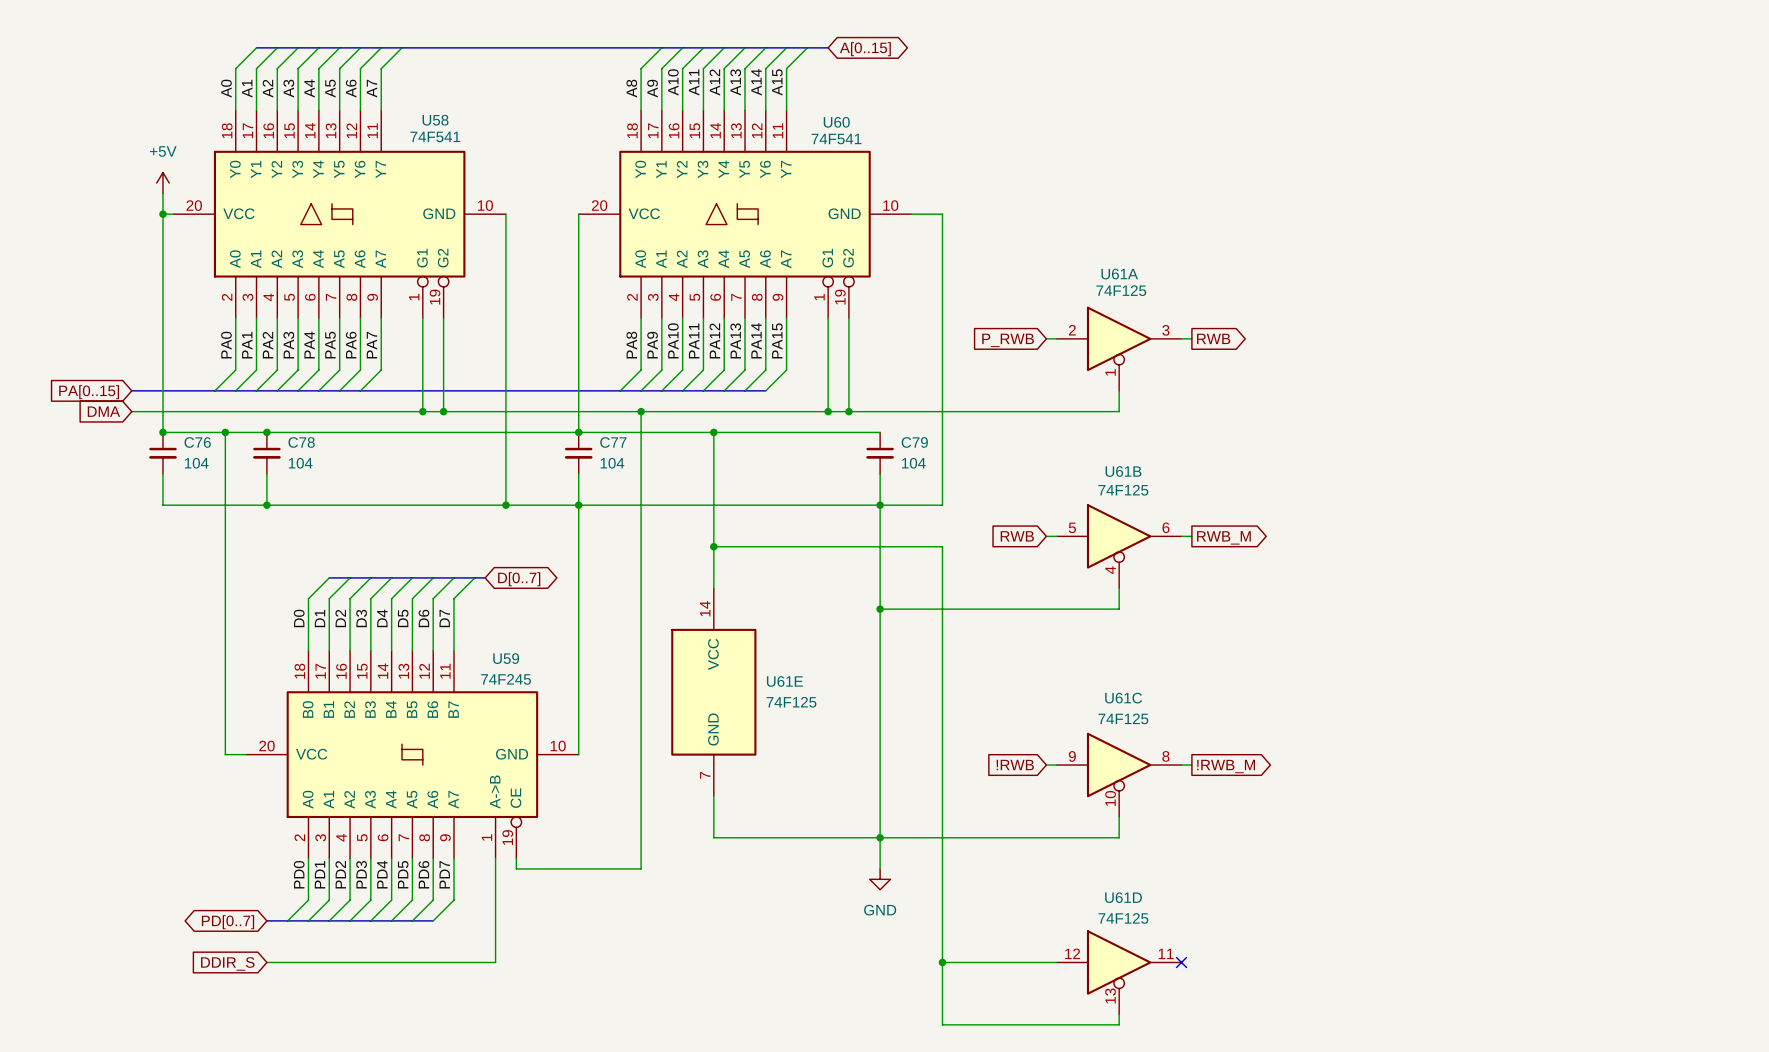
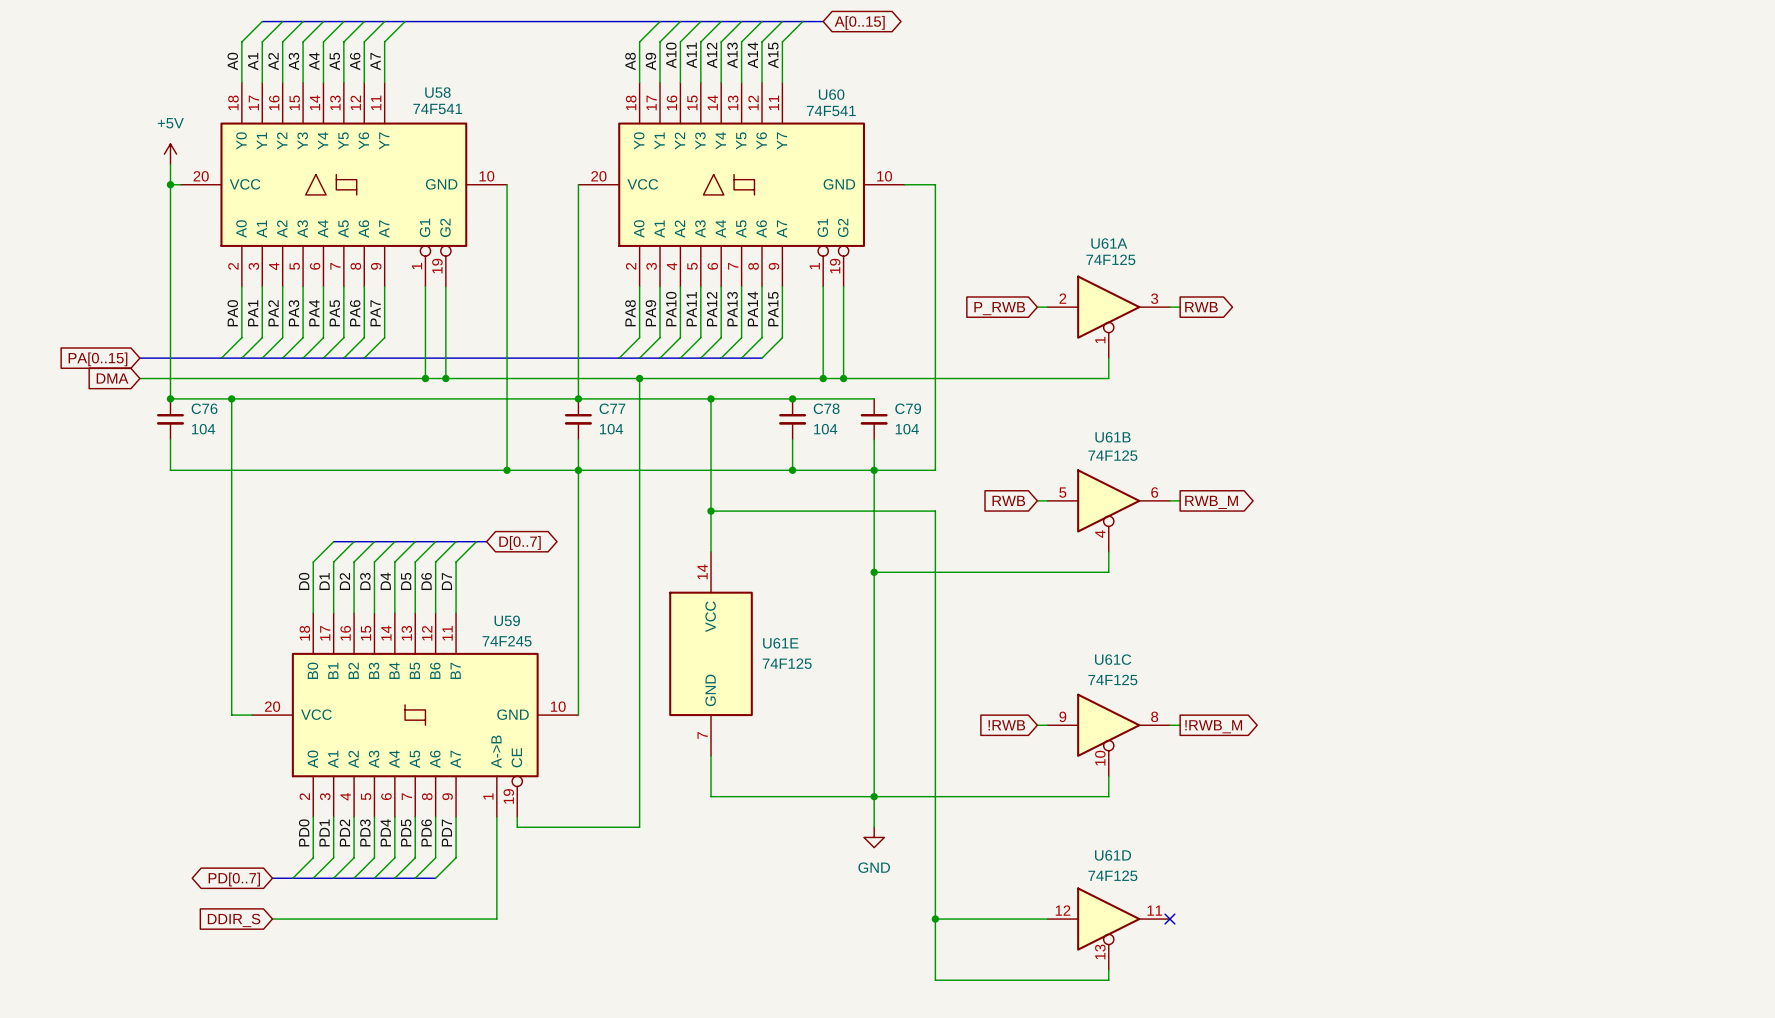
junction: (266, 432) -> none
junction: none -> (792, 398)
C78 position: (266, 453) -> (792, 419)
wire: (266, 474) (266, 505) -> none
wire: none -> (792, 439) (792, 470)
junction: (266, 505) -> none
junction: none -> (792, 470)

